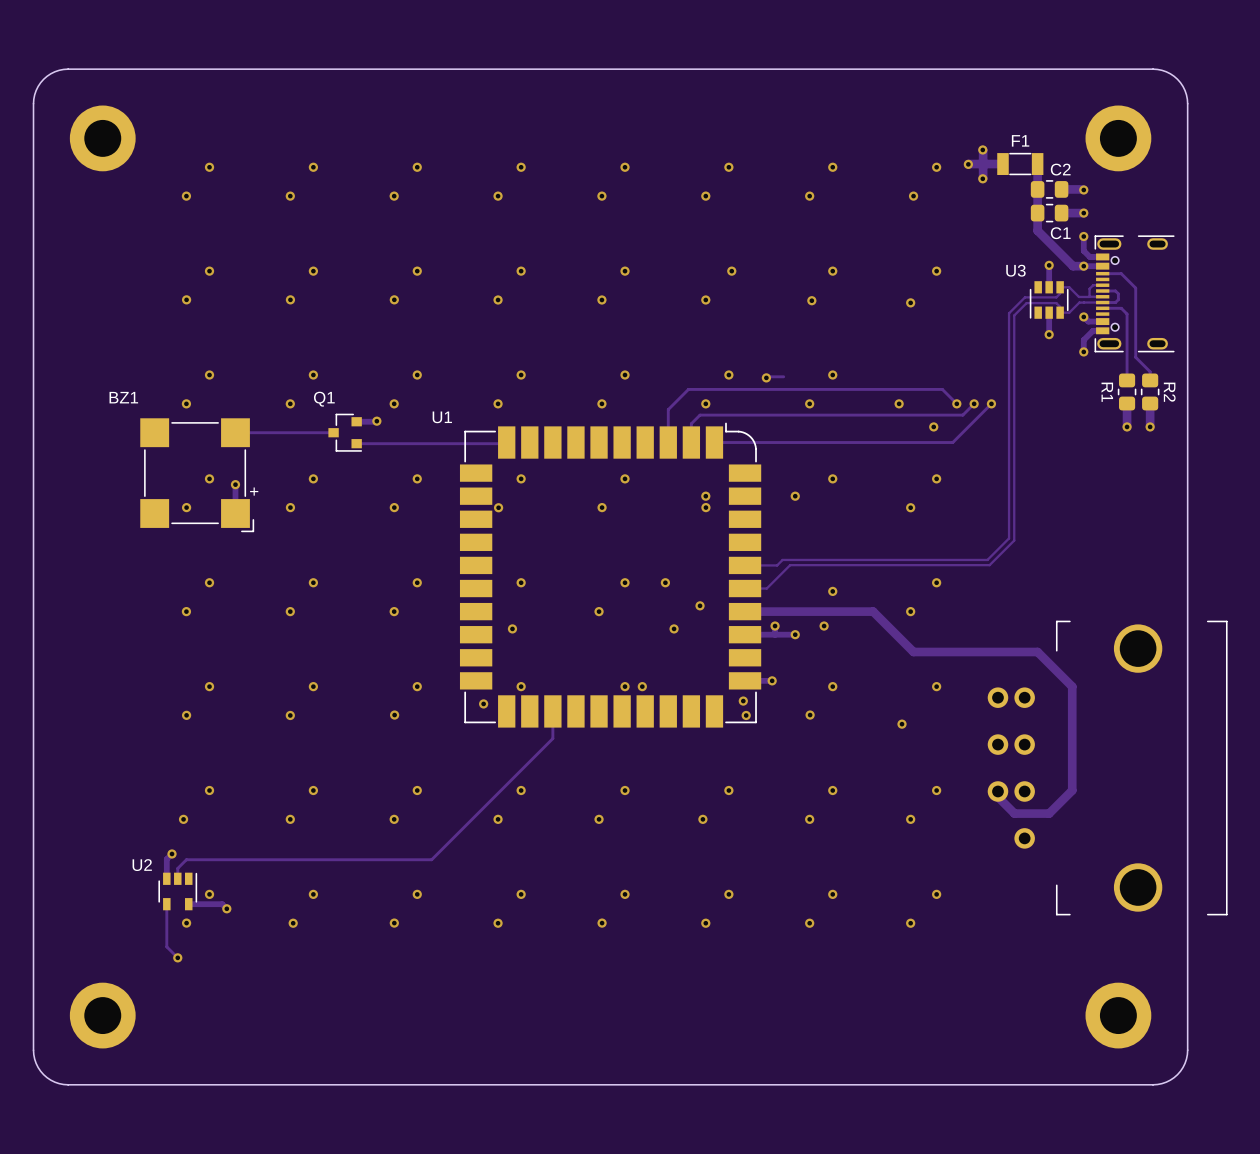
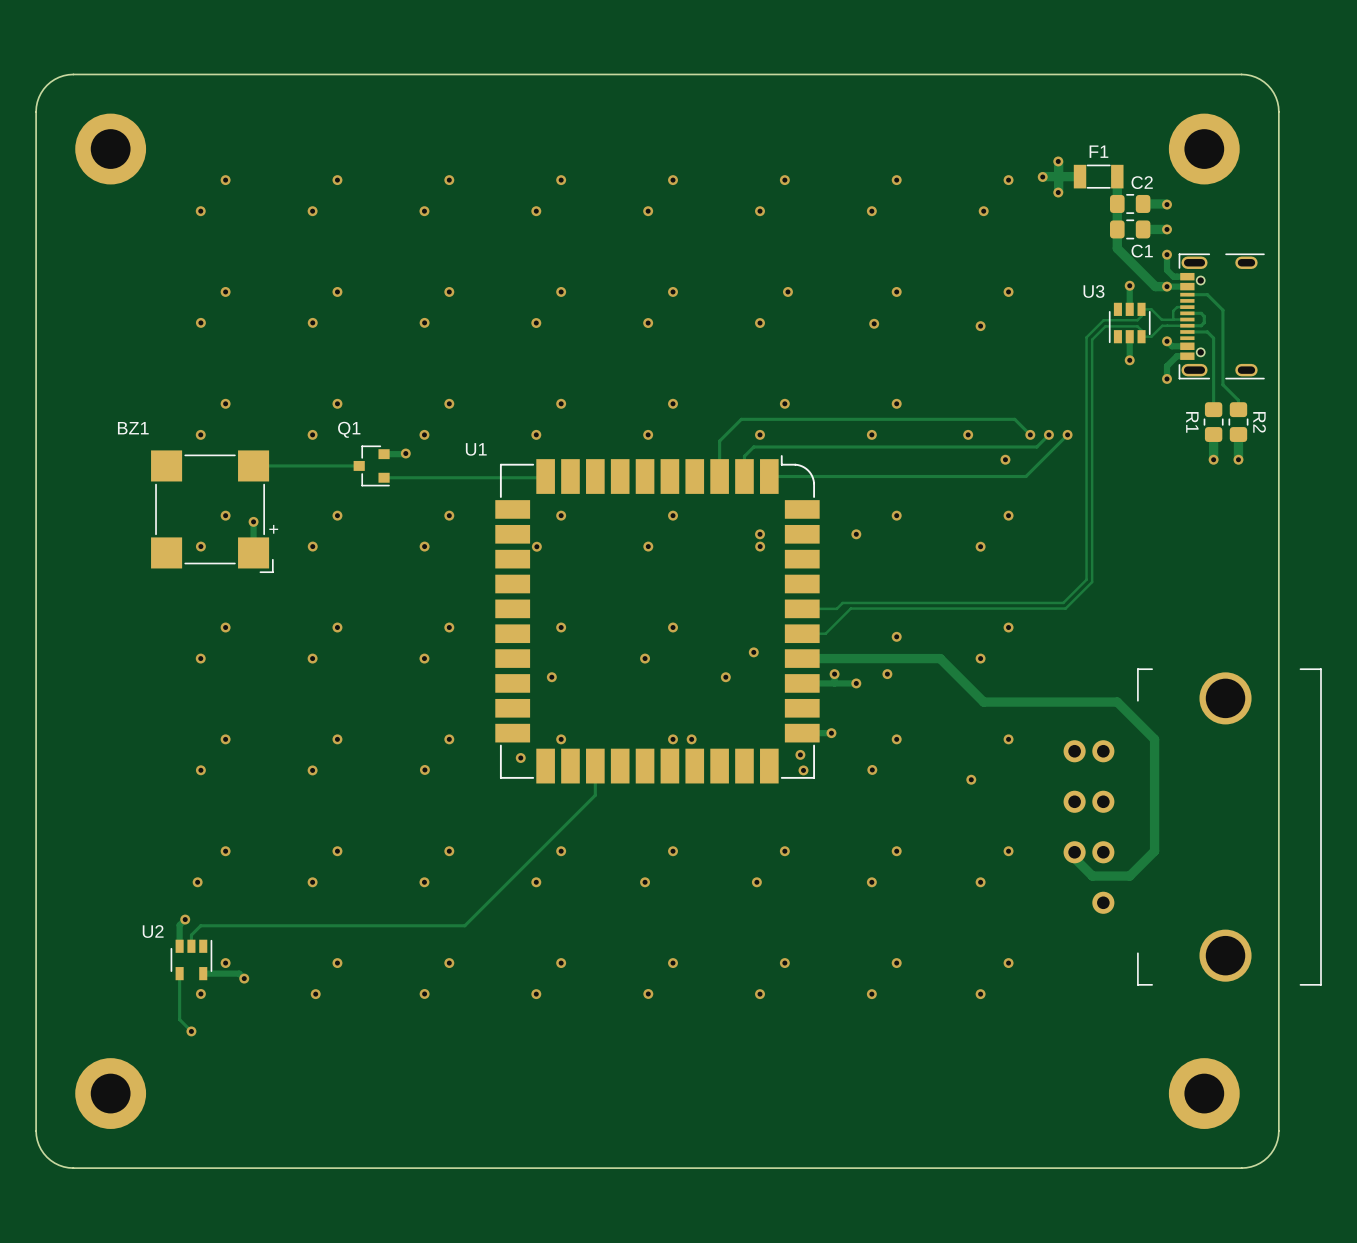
track: (783, 376) (766, 377) -> none
via: (766, 377) -> none
via: (665, 582) -> none

